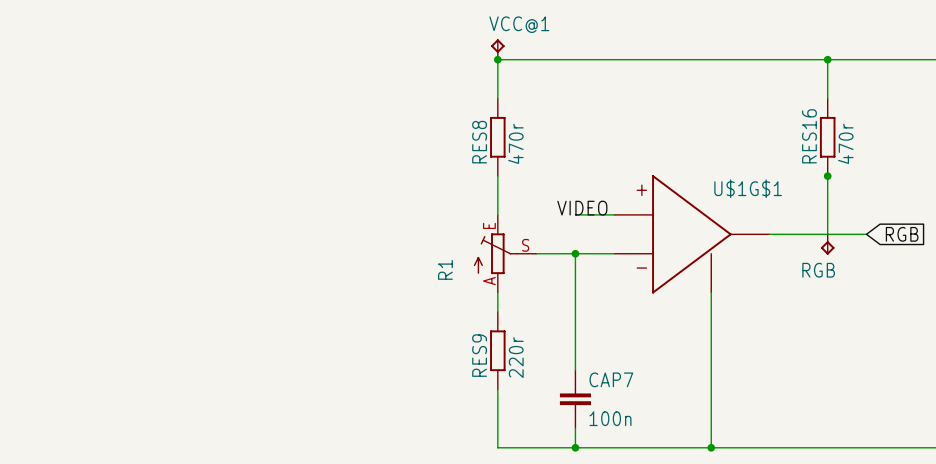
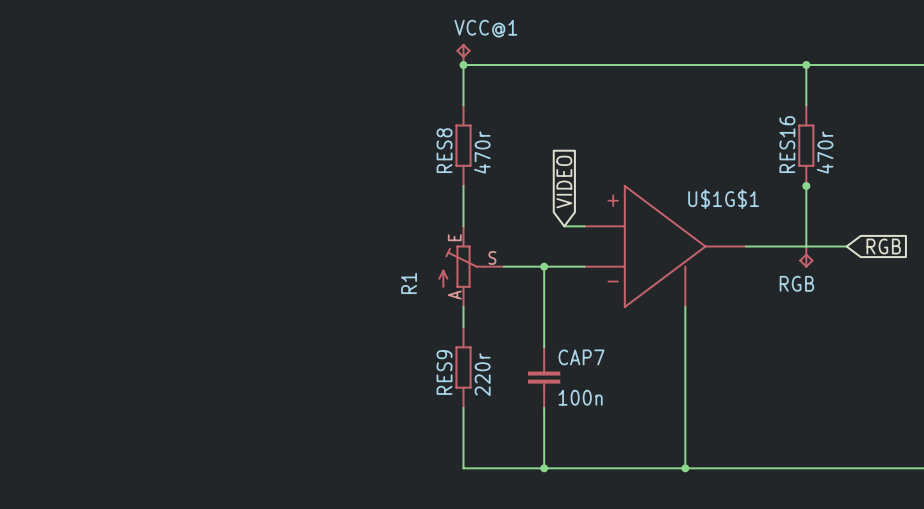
global label: none -> VIDEO (564, 182)
label: VIDEO (582, 208) -> none
wire: (575, 214) (594, 214) -> none
CAP7 position: (575, 399) -> (544, 377)

